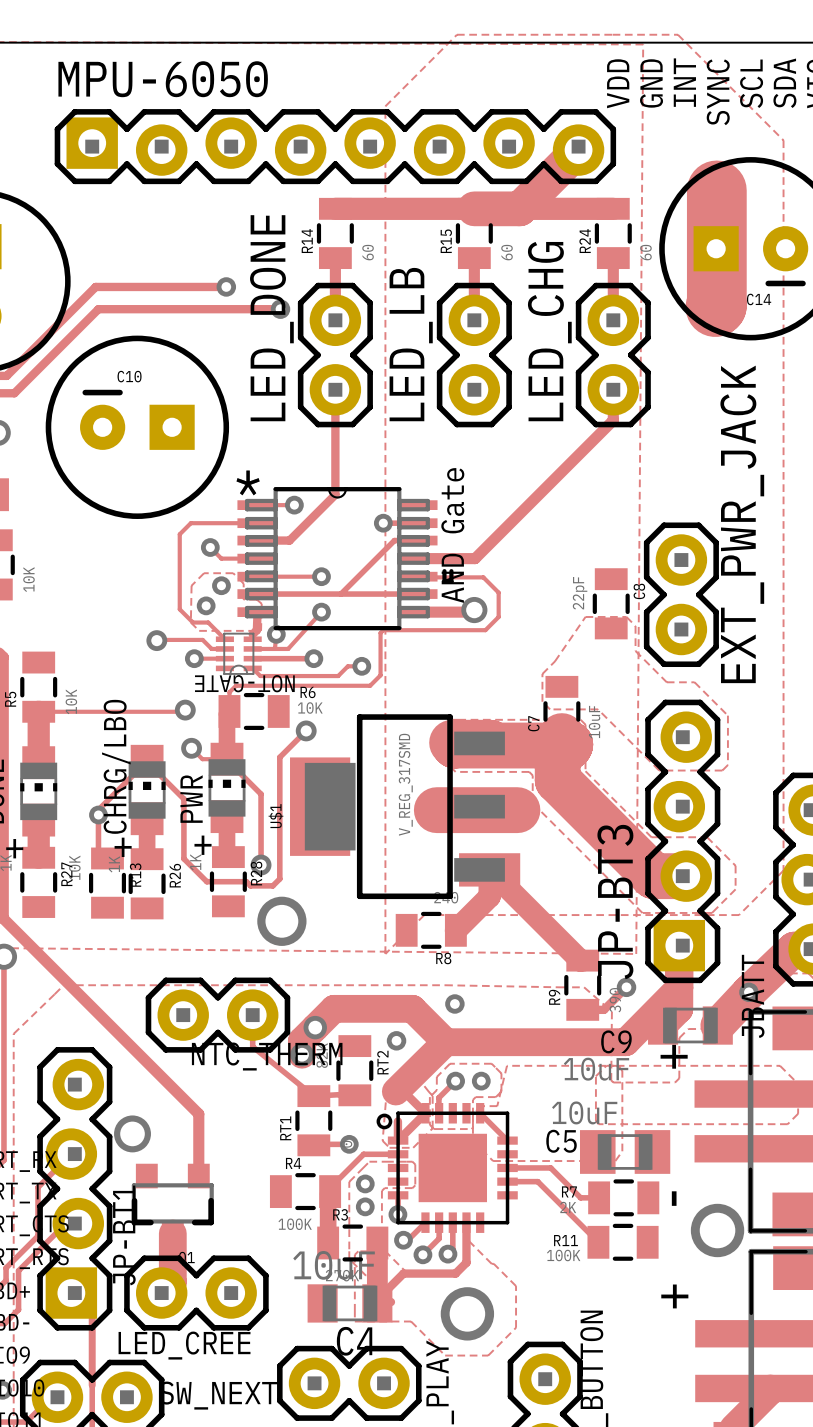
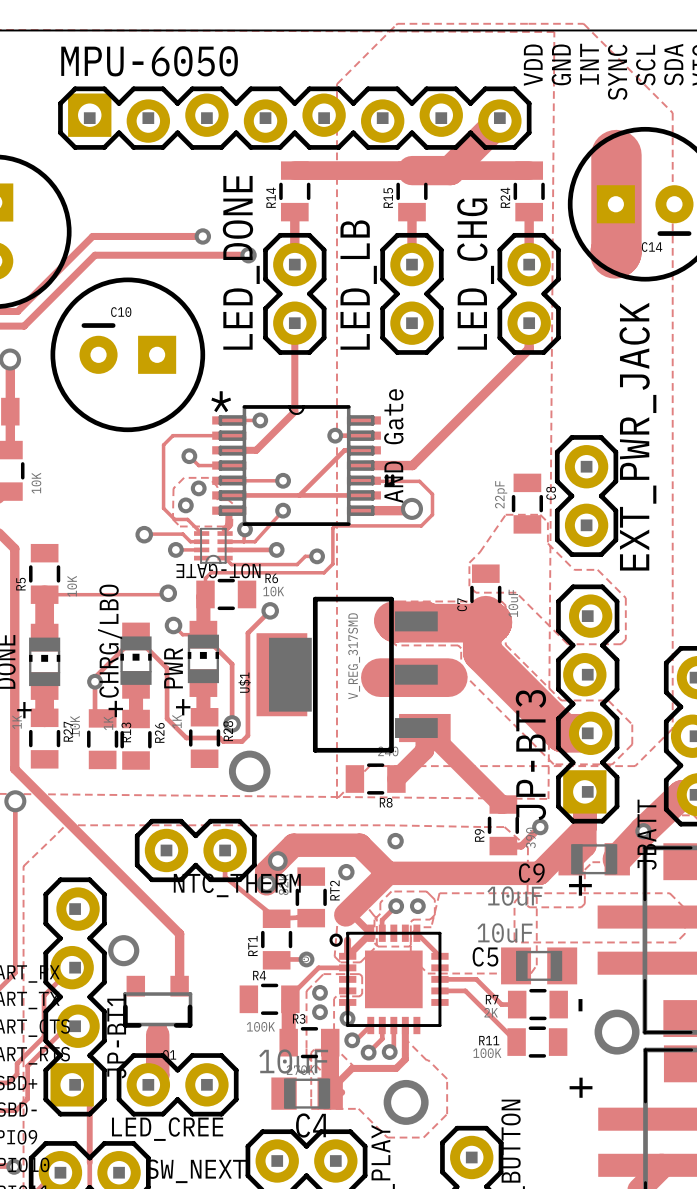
R14 value: 60 (368, 252) -> none
R15 value: 60 (507, 252) -> none
R24 value: 60 (645, 252) -> none

